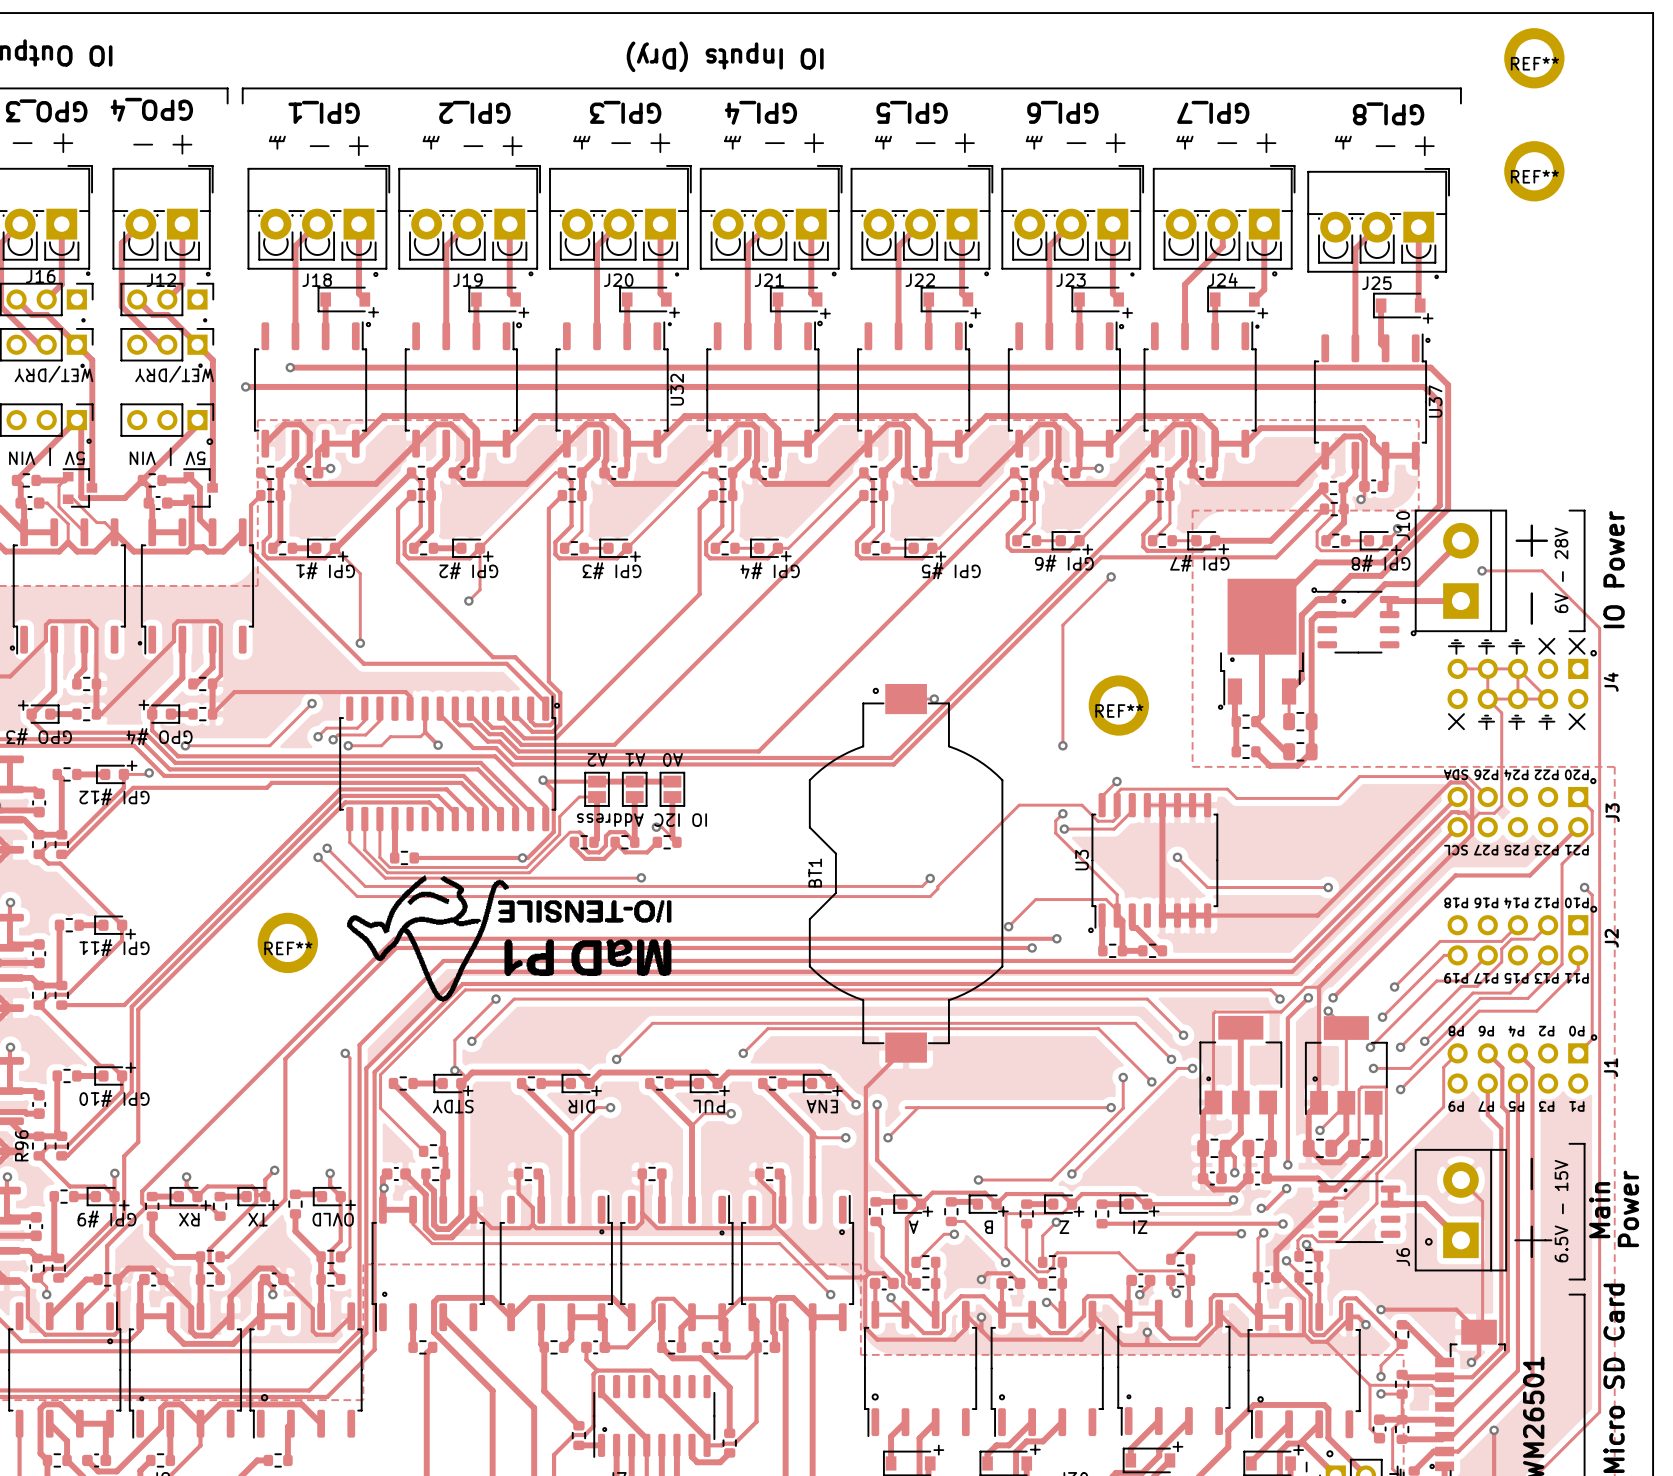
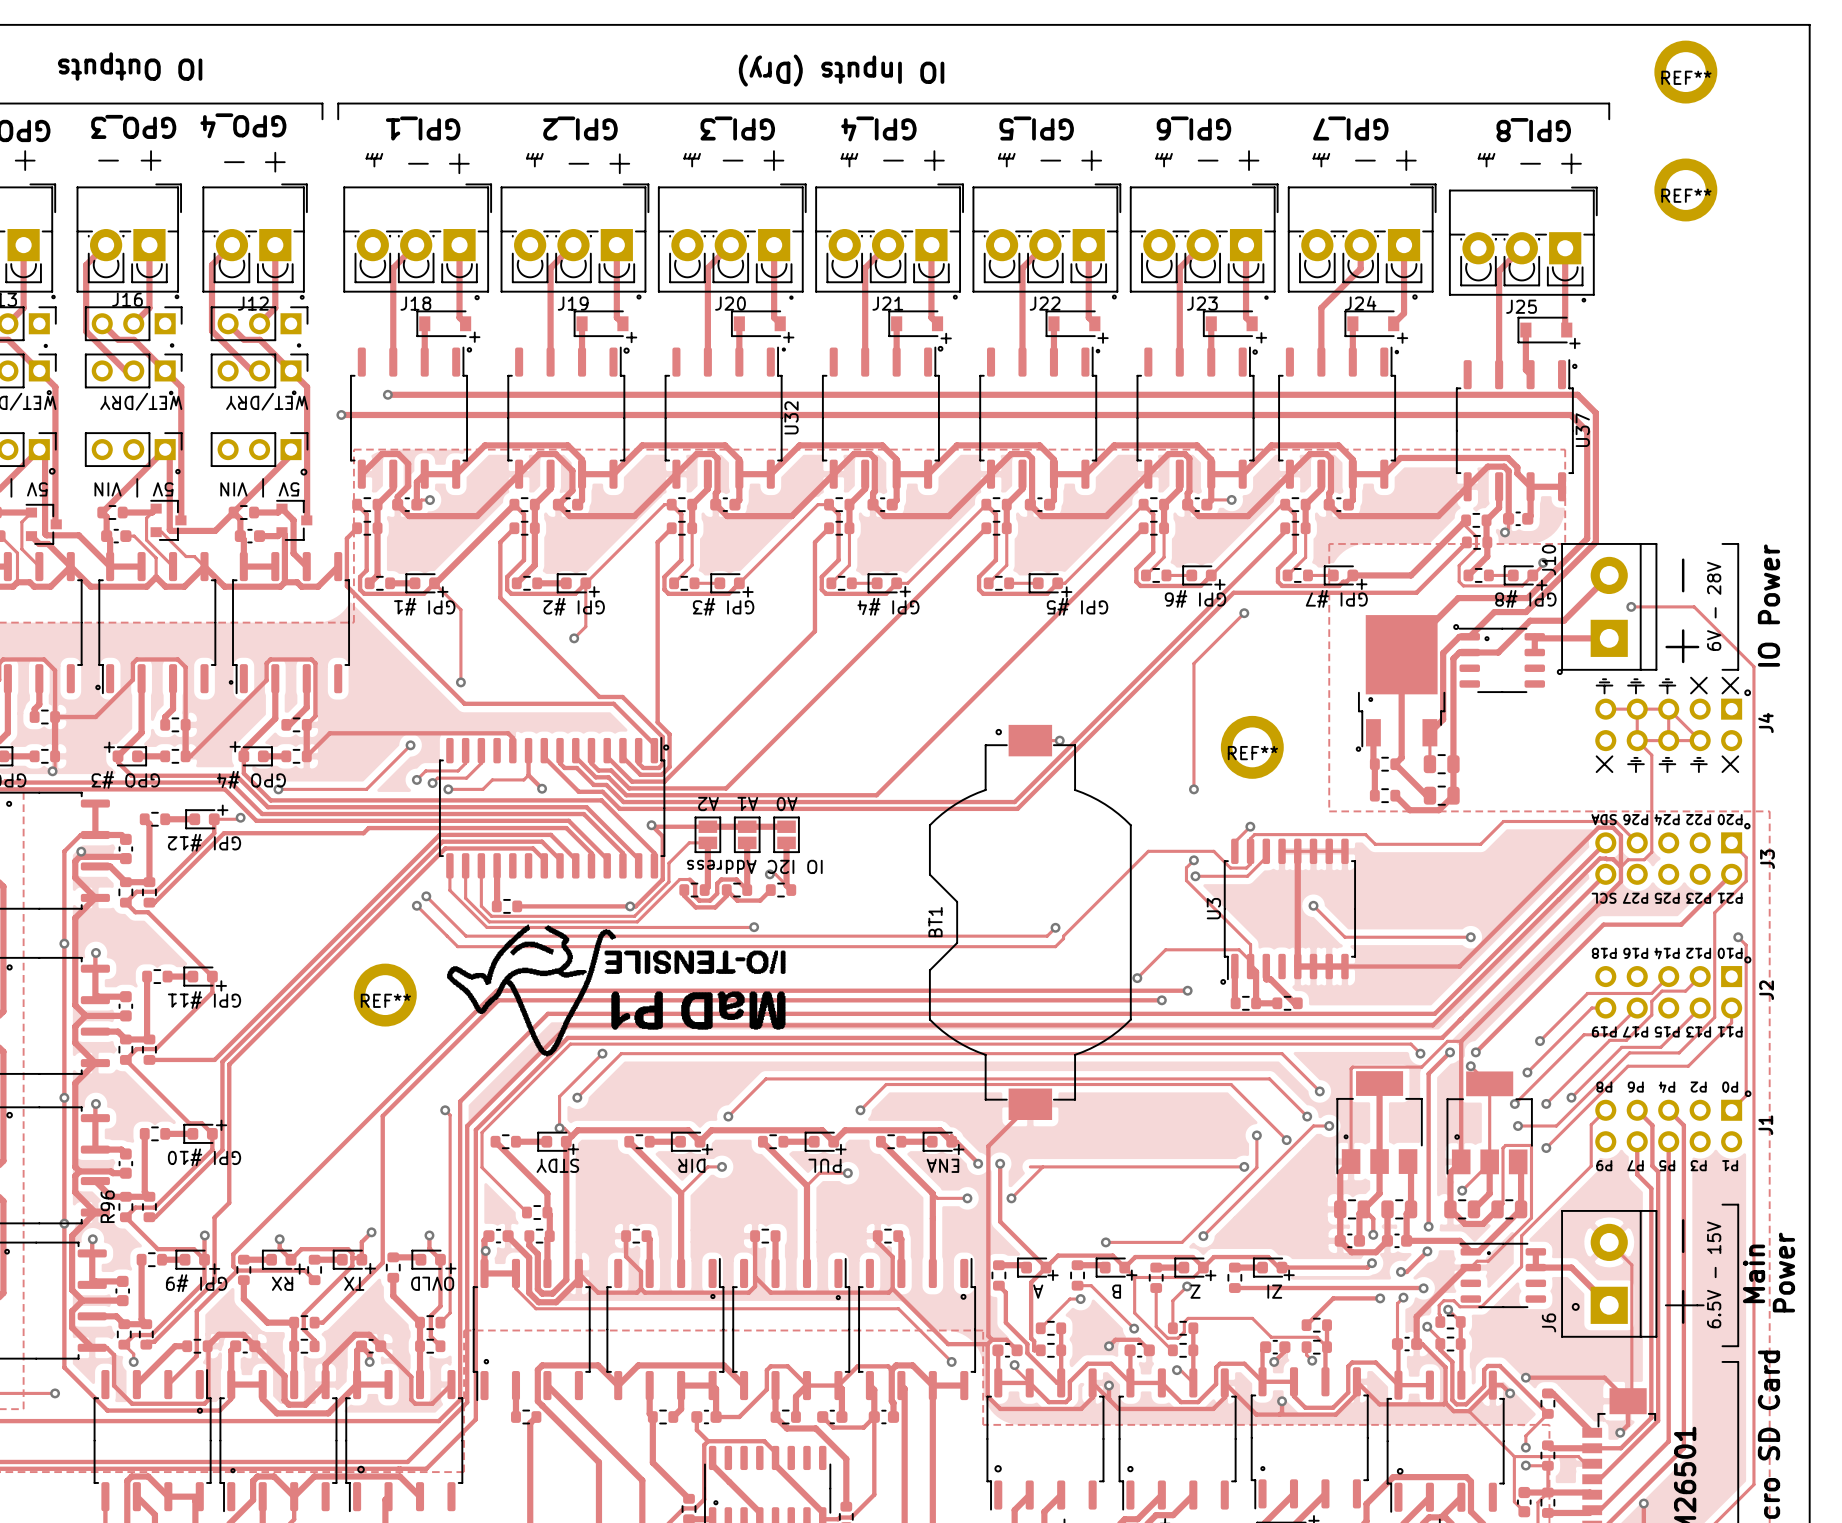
line: (1516, 540) (1546, 540) -> (1666, 647) (1698, 647)

